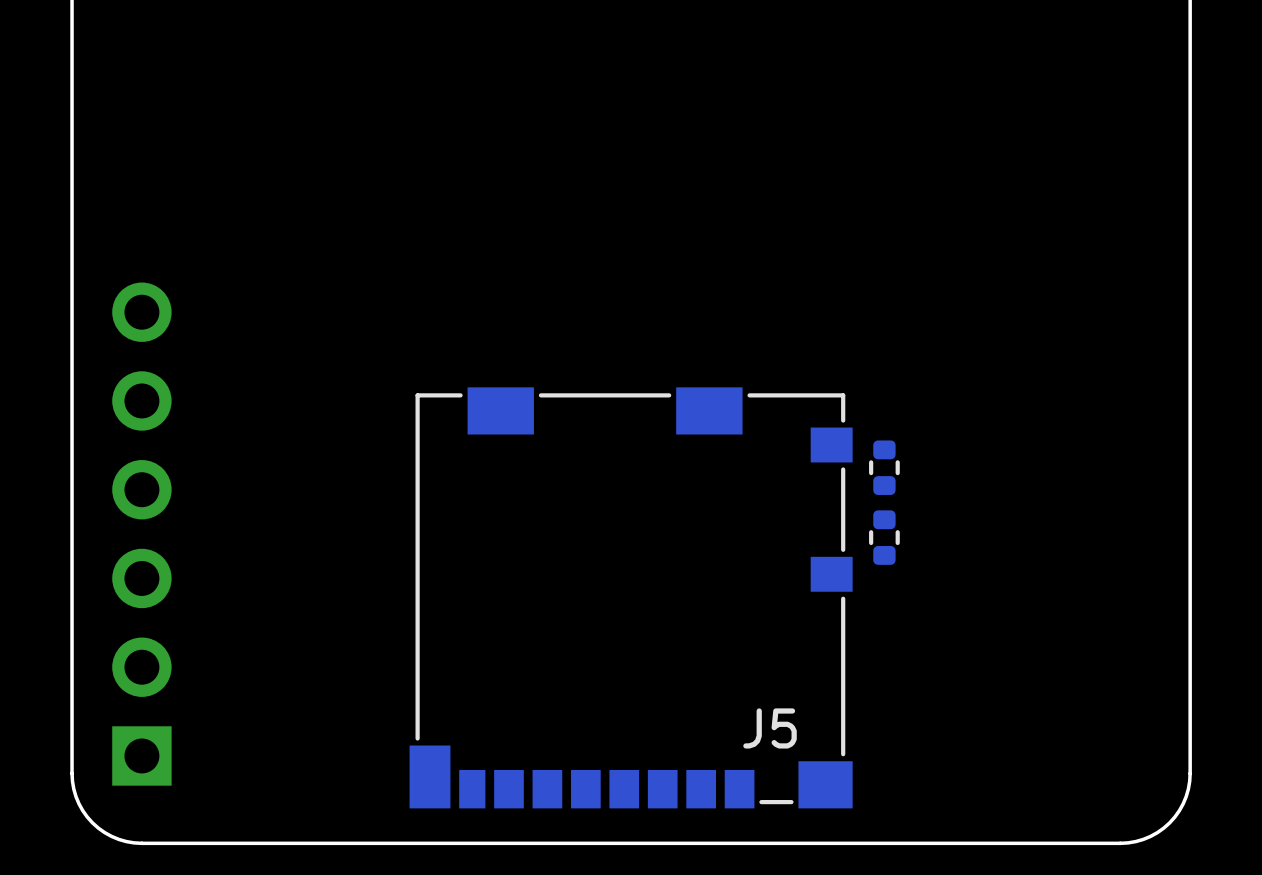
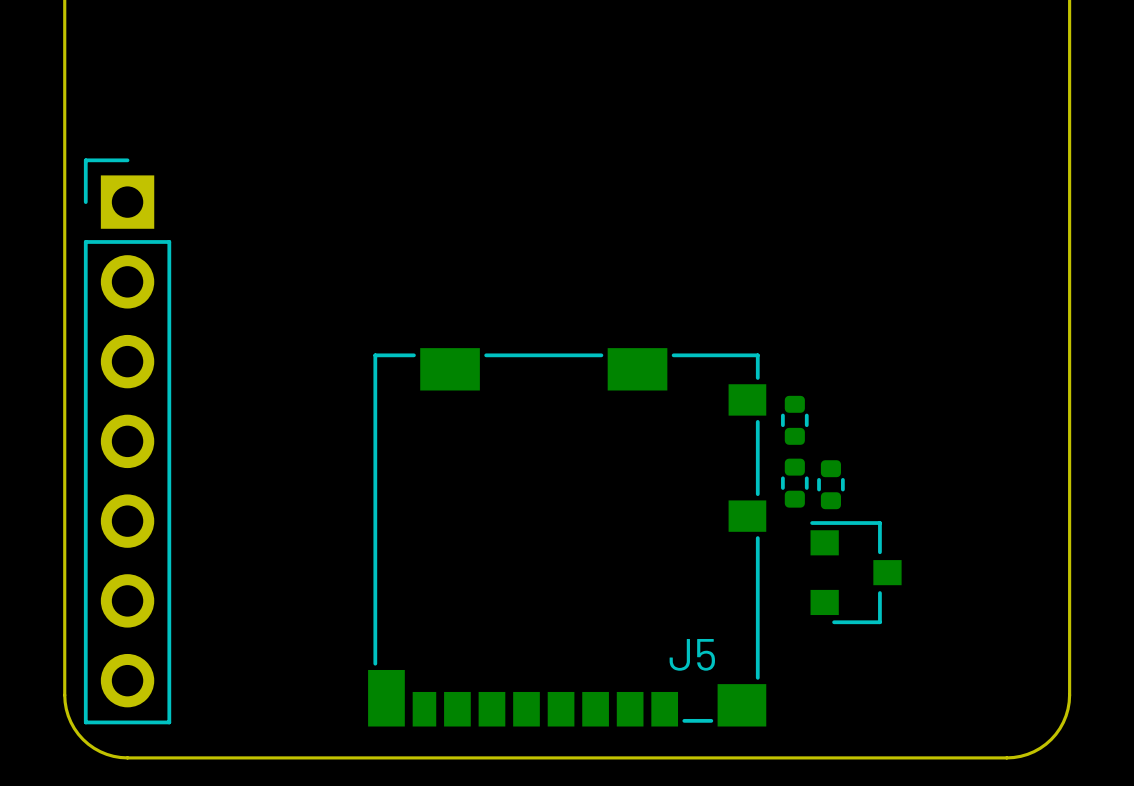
part: none -> (127, 441)
part: (141, 534) -> none
part: none -> (830, 484)
part: none -> (855, 572)

